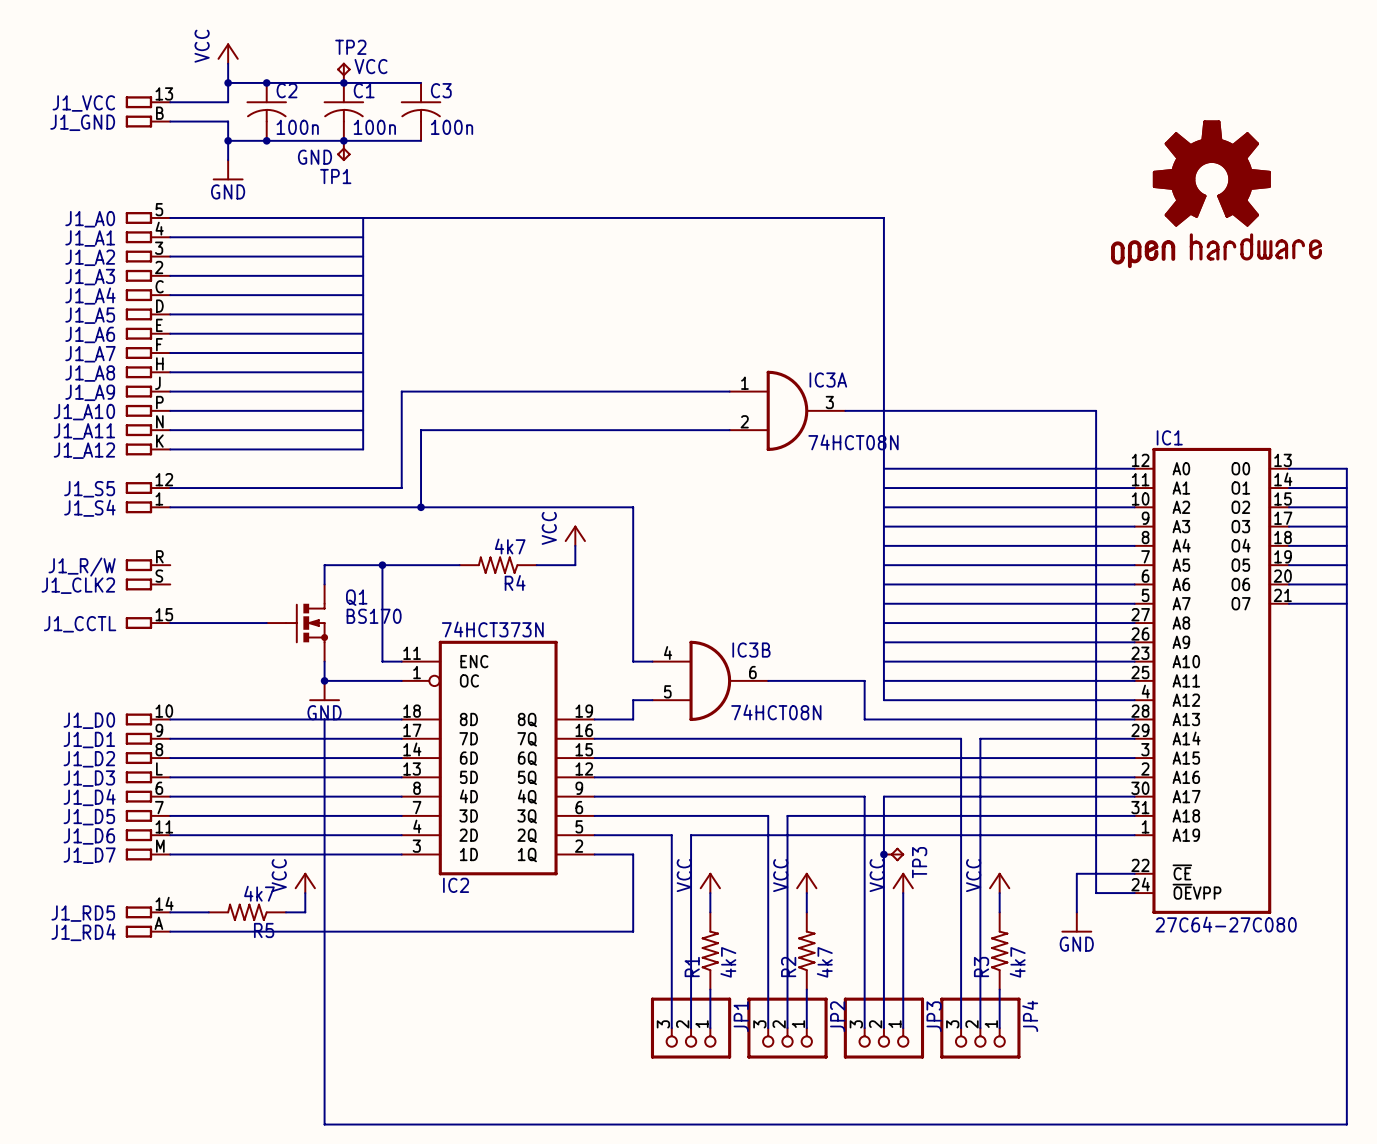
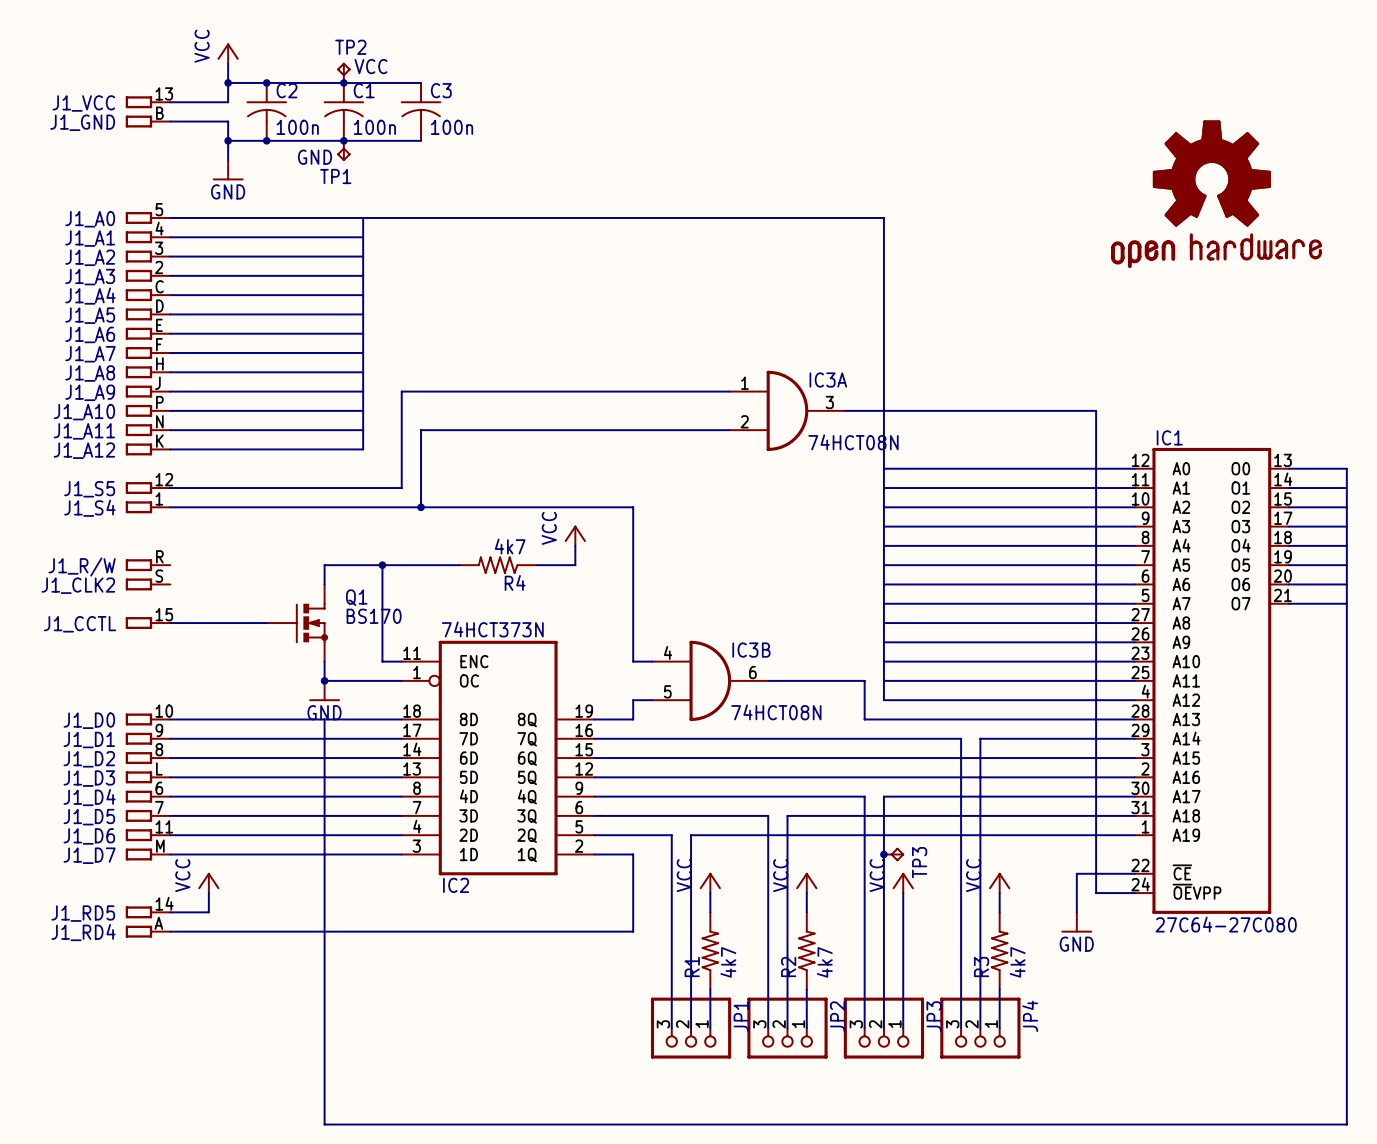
power symbol position: VCC (305, 882) -> VCC (208, 882)
wire: none -> (208, 893) (208, 912)
wire: (305, 893) (305, 912) (286, 912) -> none
R5: 4k7 (247, 912) -> none

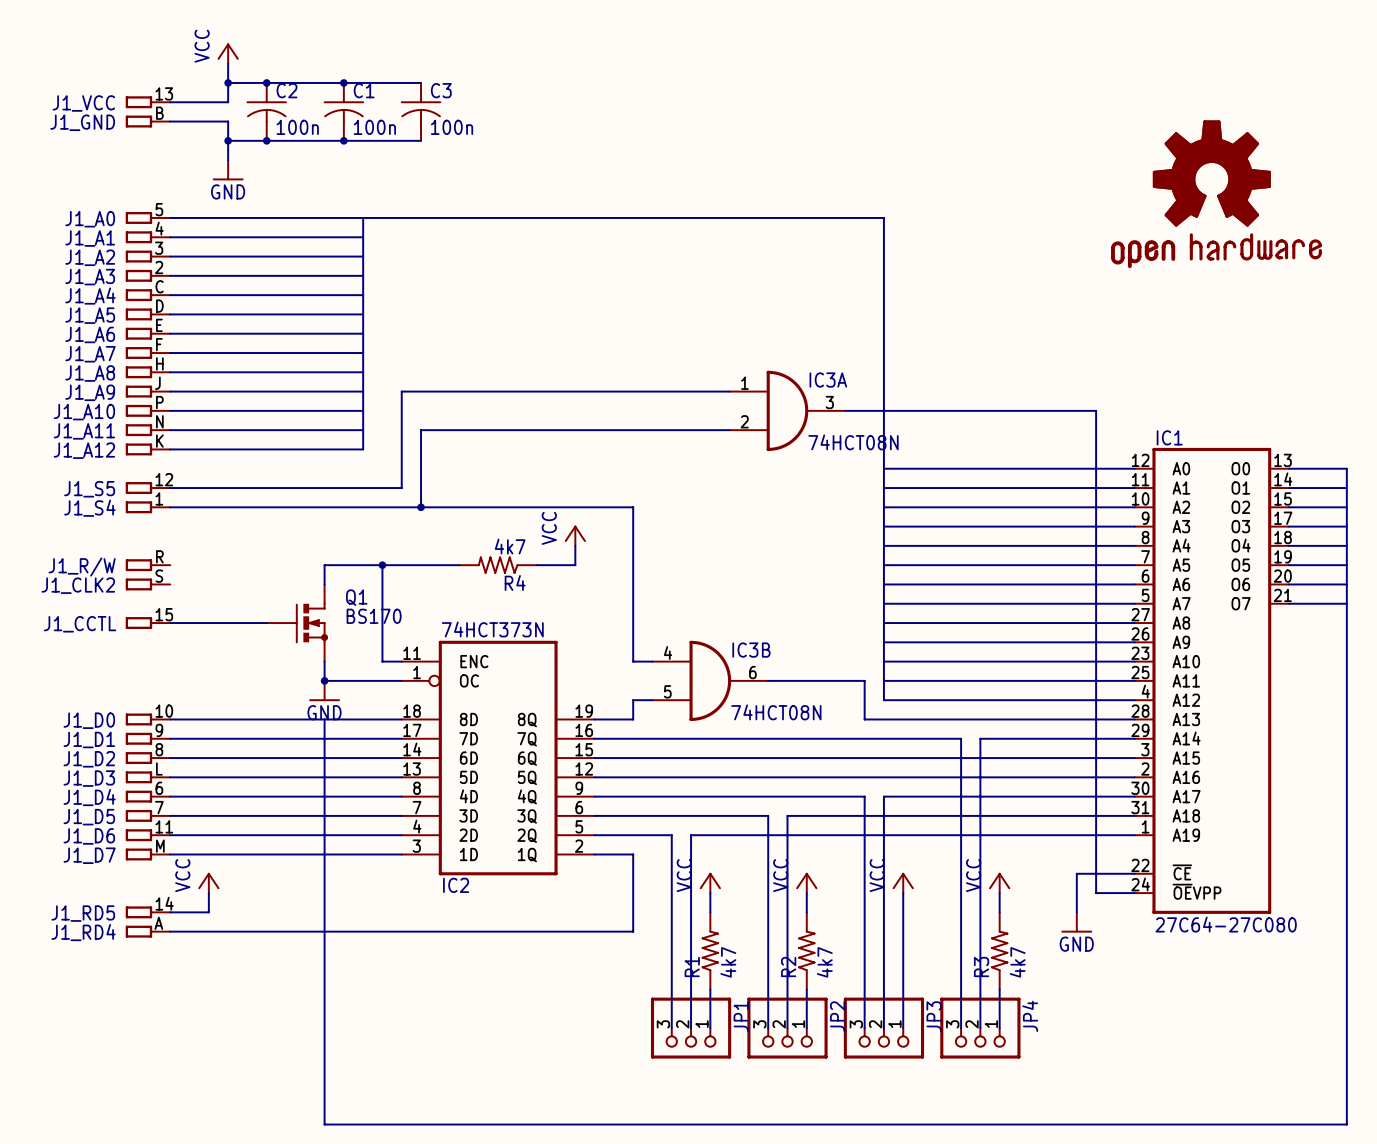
TP2: (343, 72) -> none
TP1: (343, 150) -> none
junction: (883, 854) -> none
TP3: (894, 854) -> none

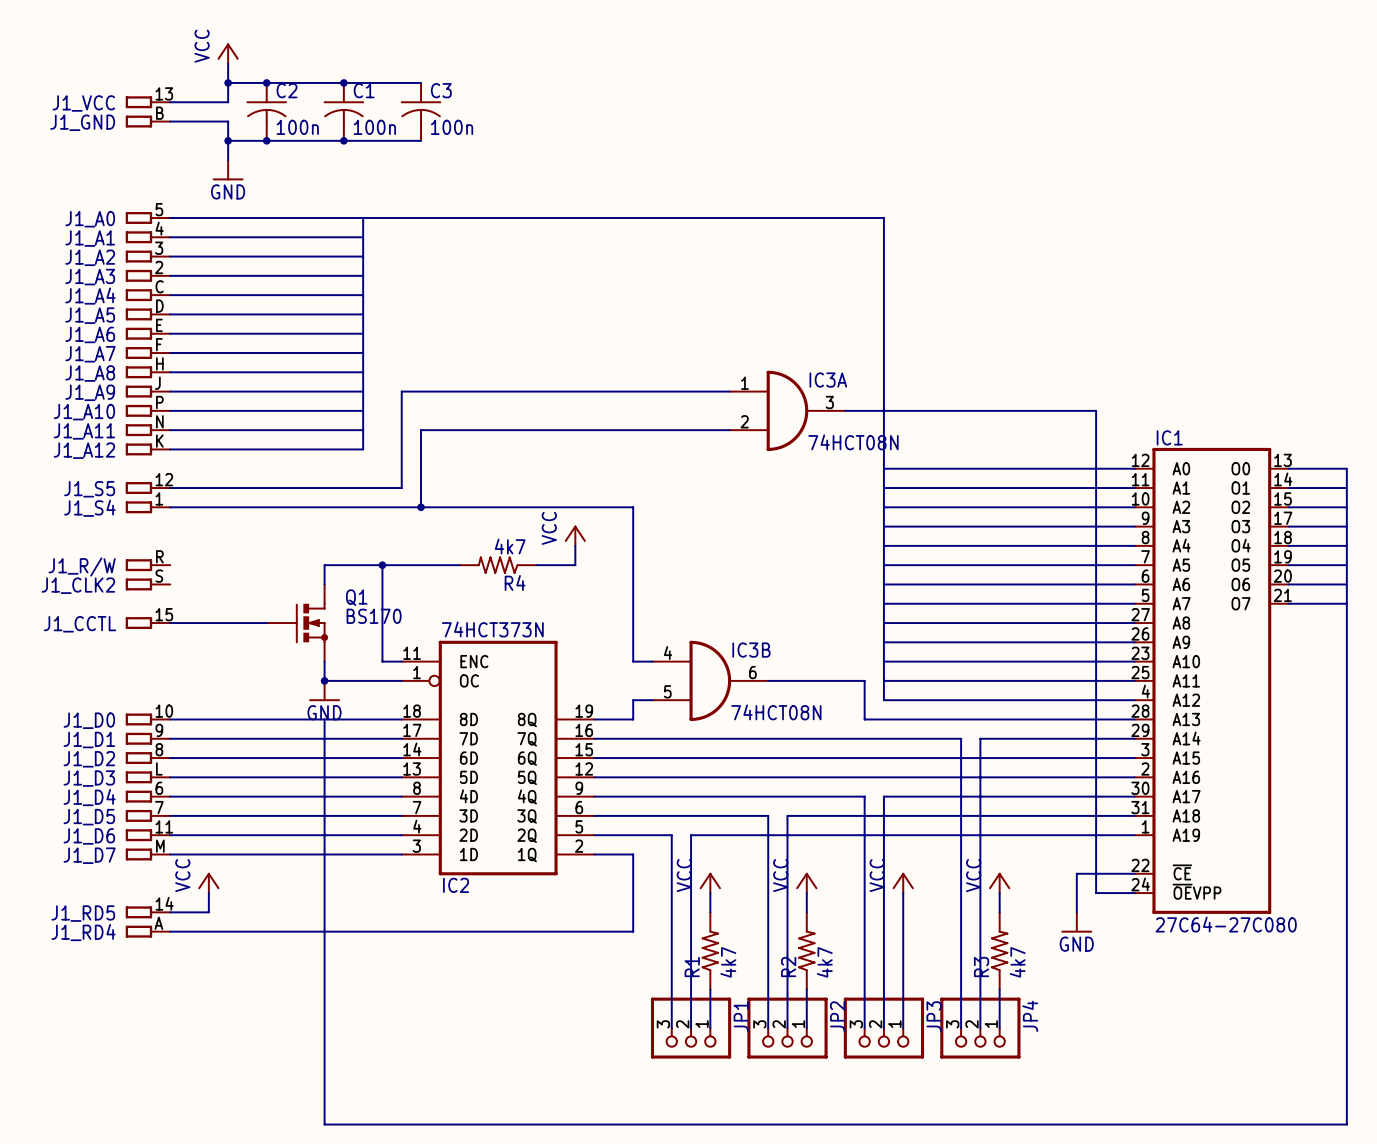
part: (1216, 194) -> none

